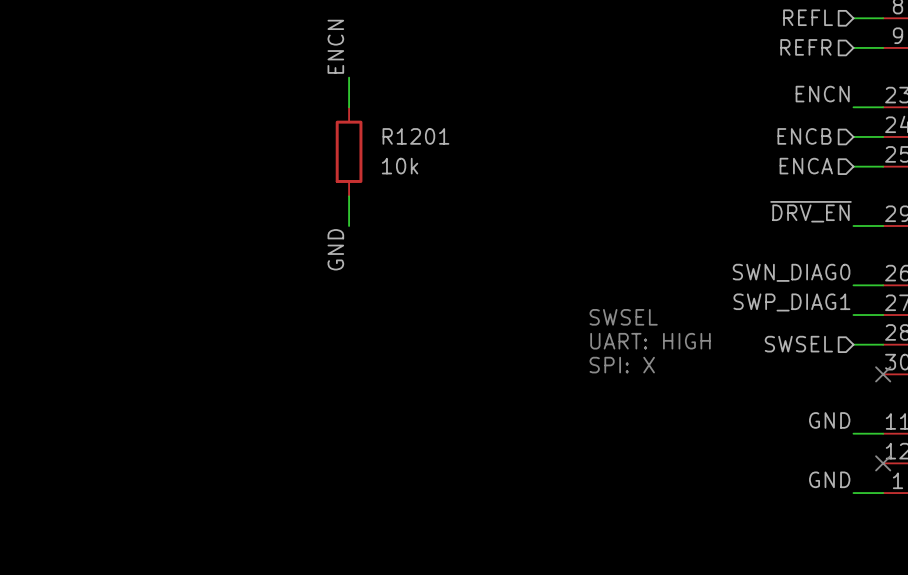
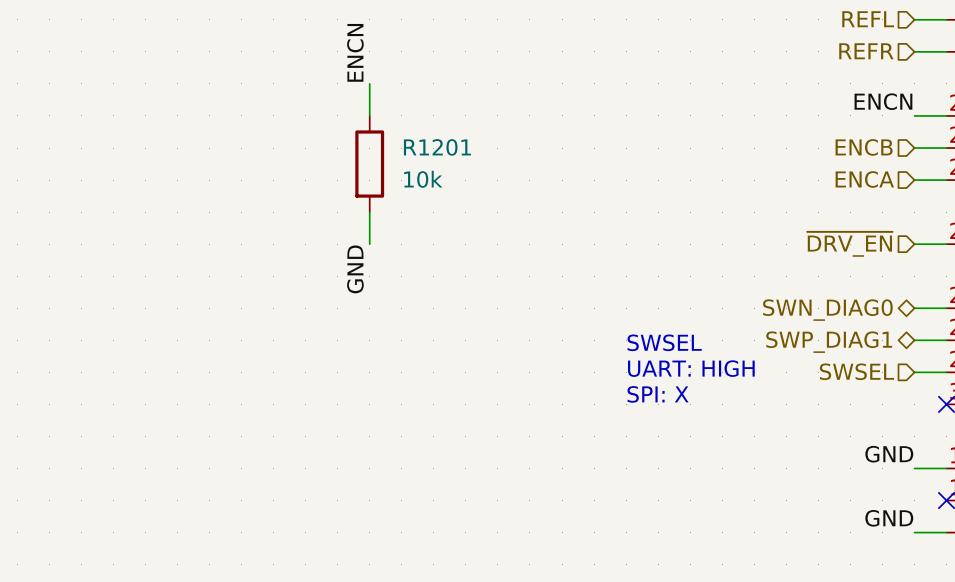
label: ~{DRV_EN} (811, 211) -> none
hierarchical label: none -> ~{DRV_EN} (849, 244)
label: SWN_DIAG0 (791, 272) -> none
hierarchical label: none -> SWN_DIAG0 (827, 310)
label: SWP_DIAG1 (791, 302) -> none
hierarchical label: none -> SWP_DIAG1 (829, 342)

